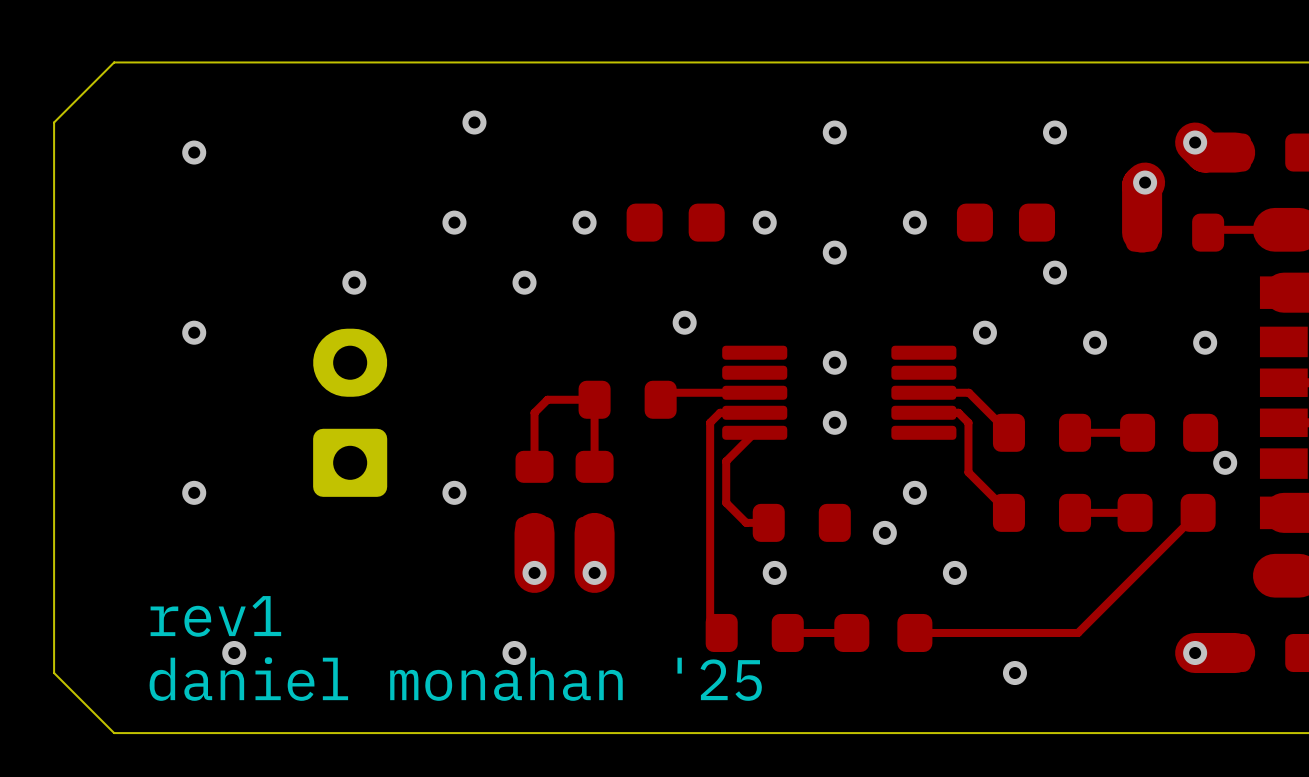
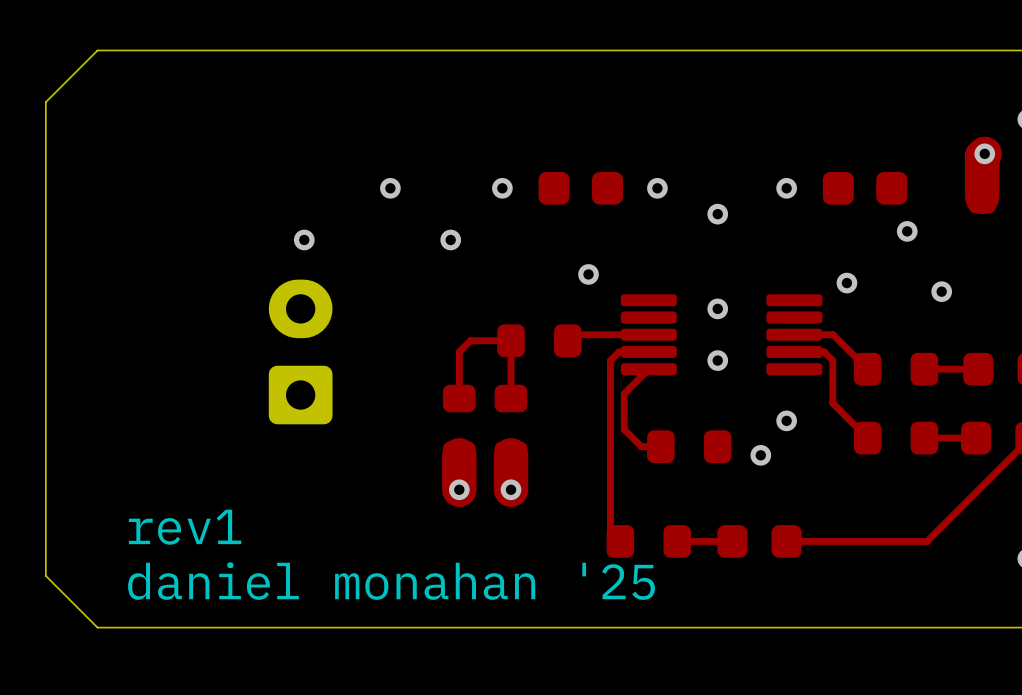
via: (474, 122) -> none
via: (834, 132) -> none
via: (1055, 132) -> none
via: (194, 152) -> none
via: (194, 332) -> none
via: (194, 492) -> none
via: (454, 492) -> none
via: (774, 572) -> none
via: (954, 572) -> none
via: (234, 653) -> none
via: (514, 653) -> none
via: (1014, 673) -> none

